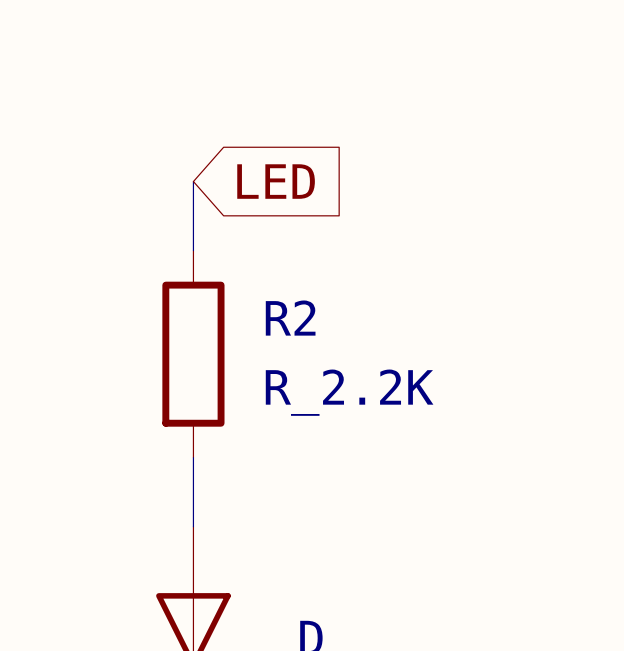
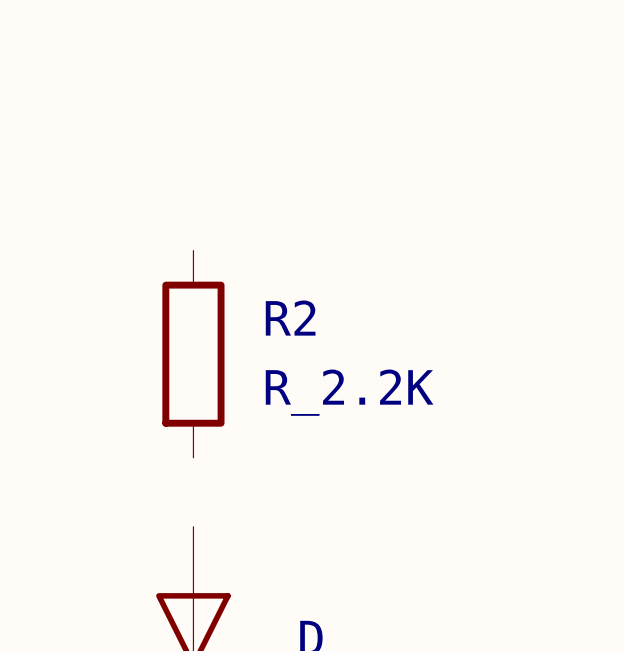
wire: (193, 181) (193, 250) -> none
global label: LED (276, 181) -> none
wire: (193, 457) (193, 526) -> none

